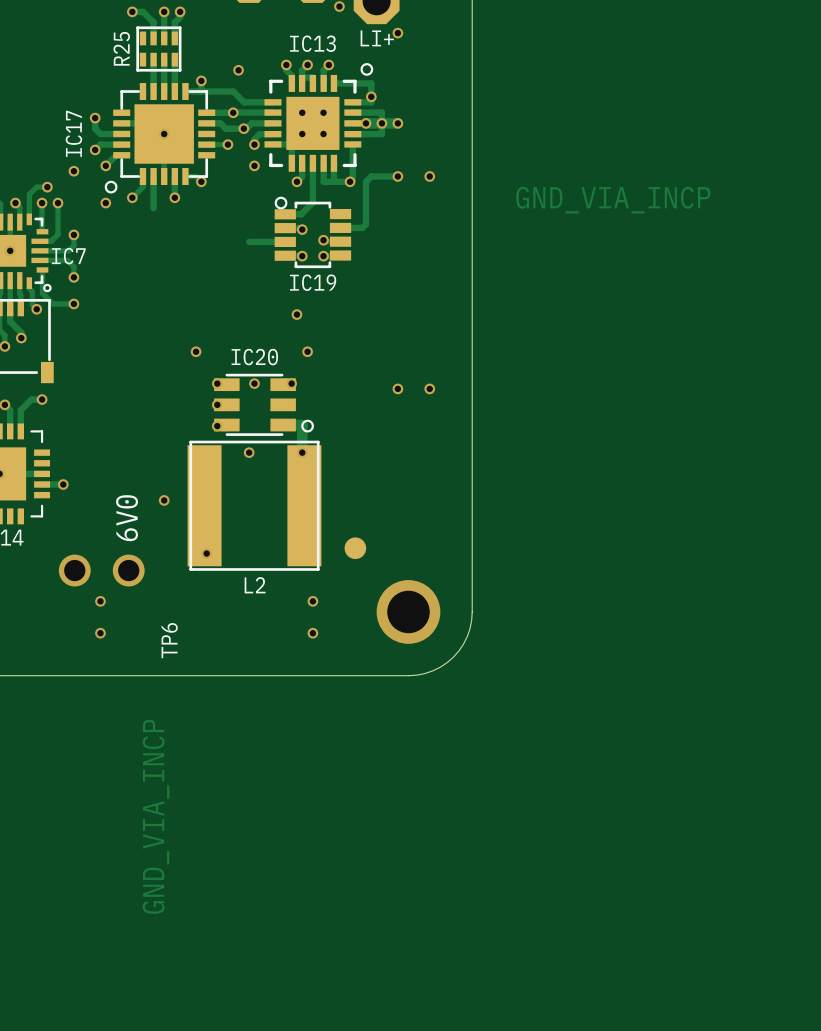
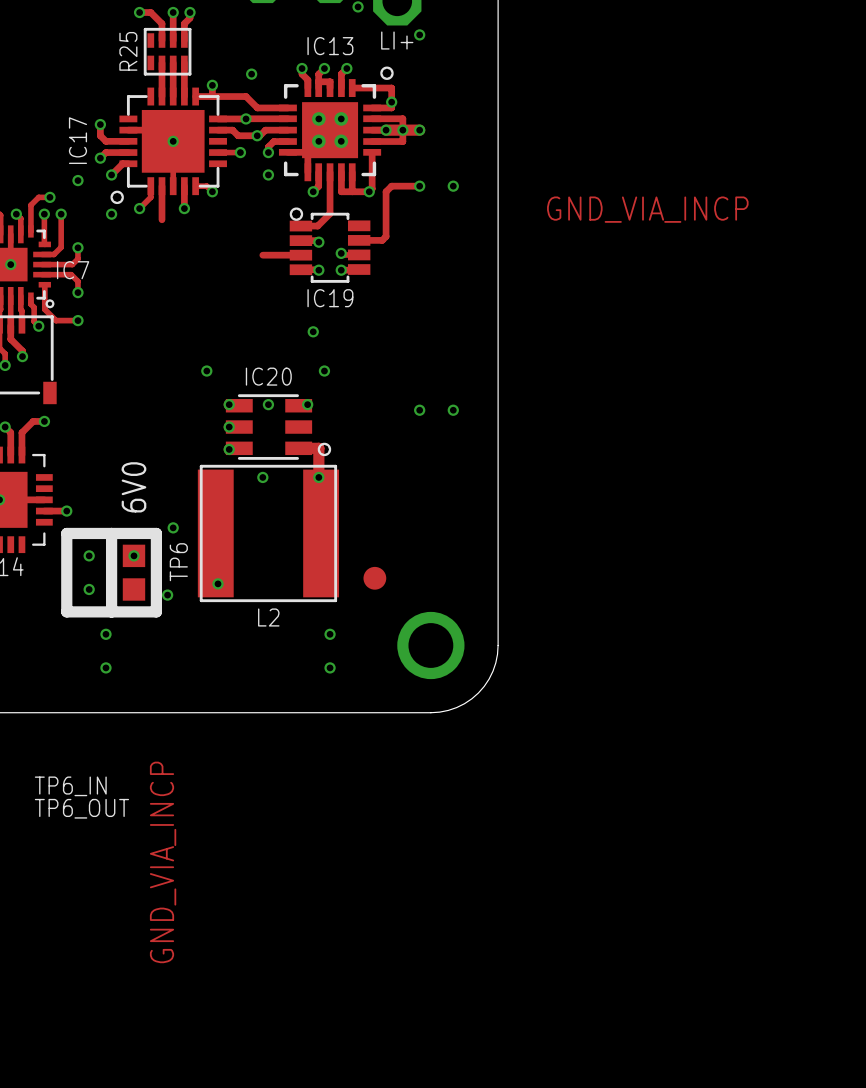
line: none -> (66, 533) (156, 533) (156, 611) (66, 611) (66, 533)
line: none -> (111, 533) (111, 611)
text position: 6V0 (127, 518) -> 6V0 (133, 487)
via: none -> (89, 555)
via: none -> (133, 555)
TP6_IN: none -> (133, 555)
via size: [58, 554, 91, 587] -> [83, 583, 95, 596]
TP6_OUT: none -> (133, 589)
via: none -> (167, 595)
via: (128, 570) -> none
text position: TP6 (169, 640) -> TP6 (178, 562)

